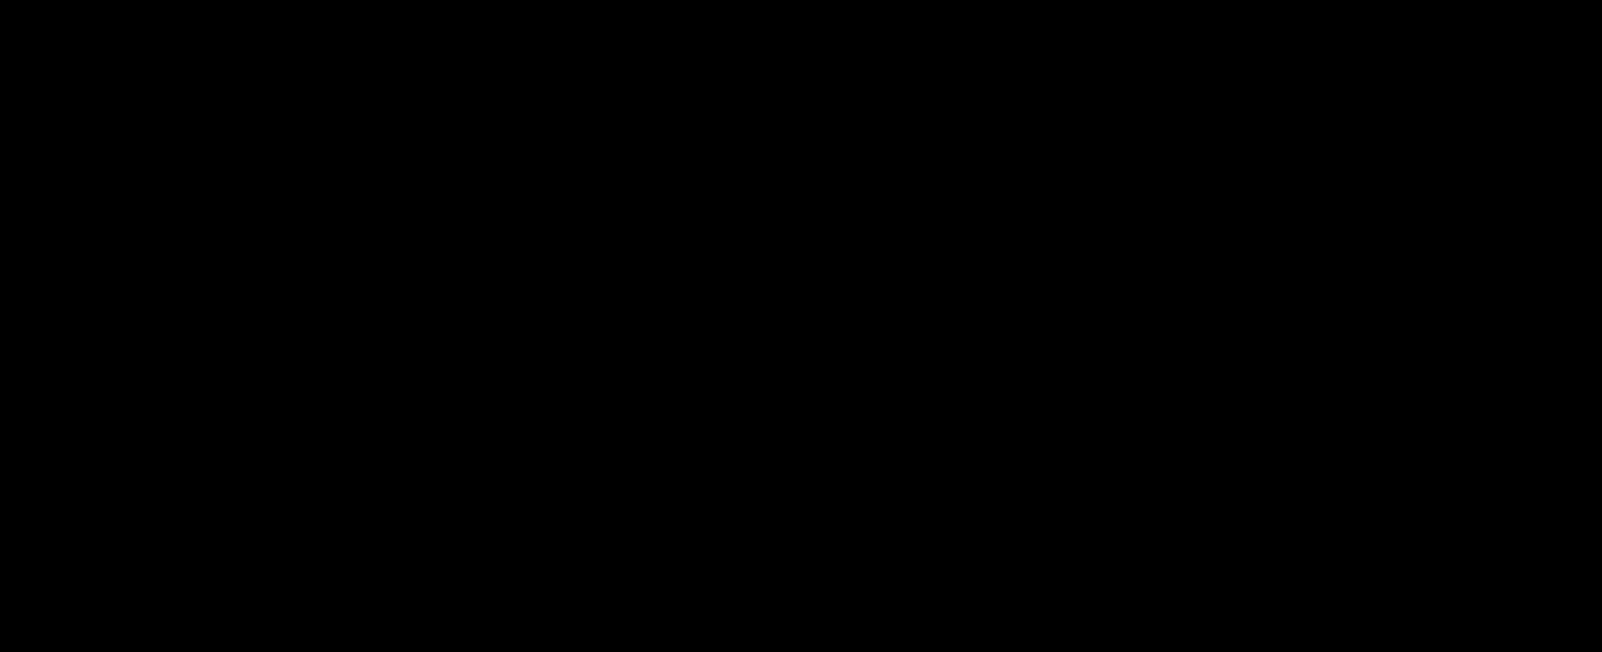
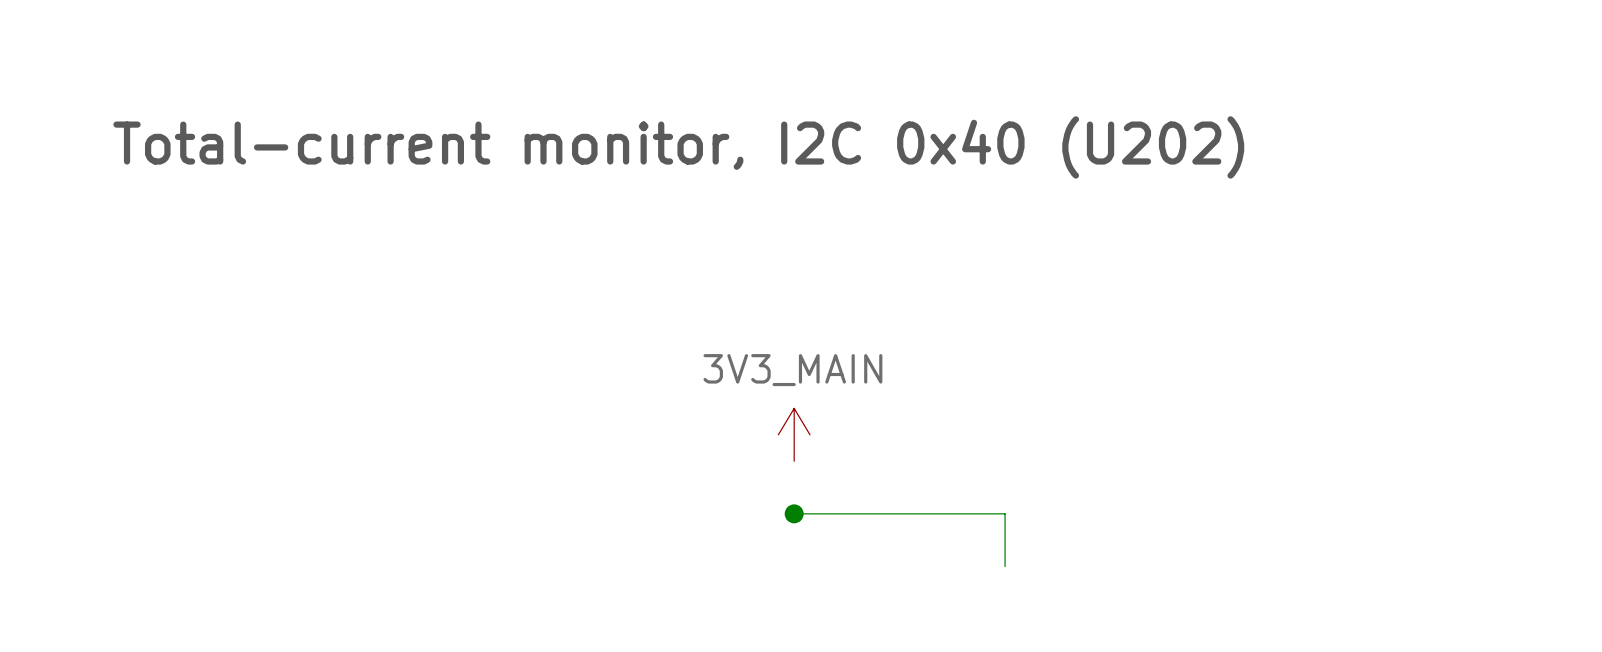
text: none -> Total-current monitor, I2C 0x40 (U202) (678, 147)
power symbol: none -> 3V3_MAIN (794, 434)
wire: none -> (794, 513) (1005, 513) (1005, 566)
junction: none -> (794, 513)

